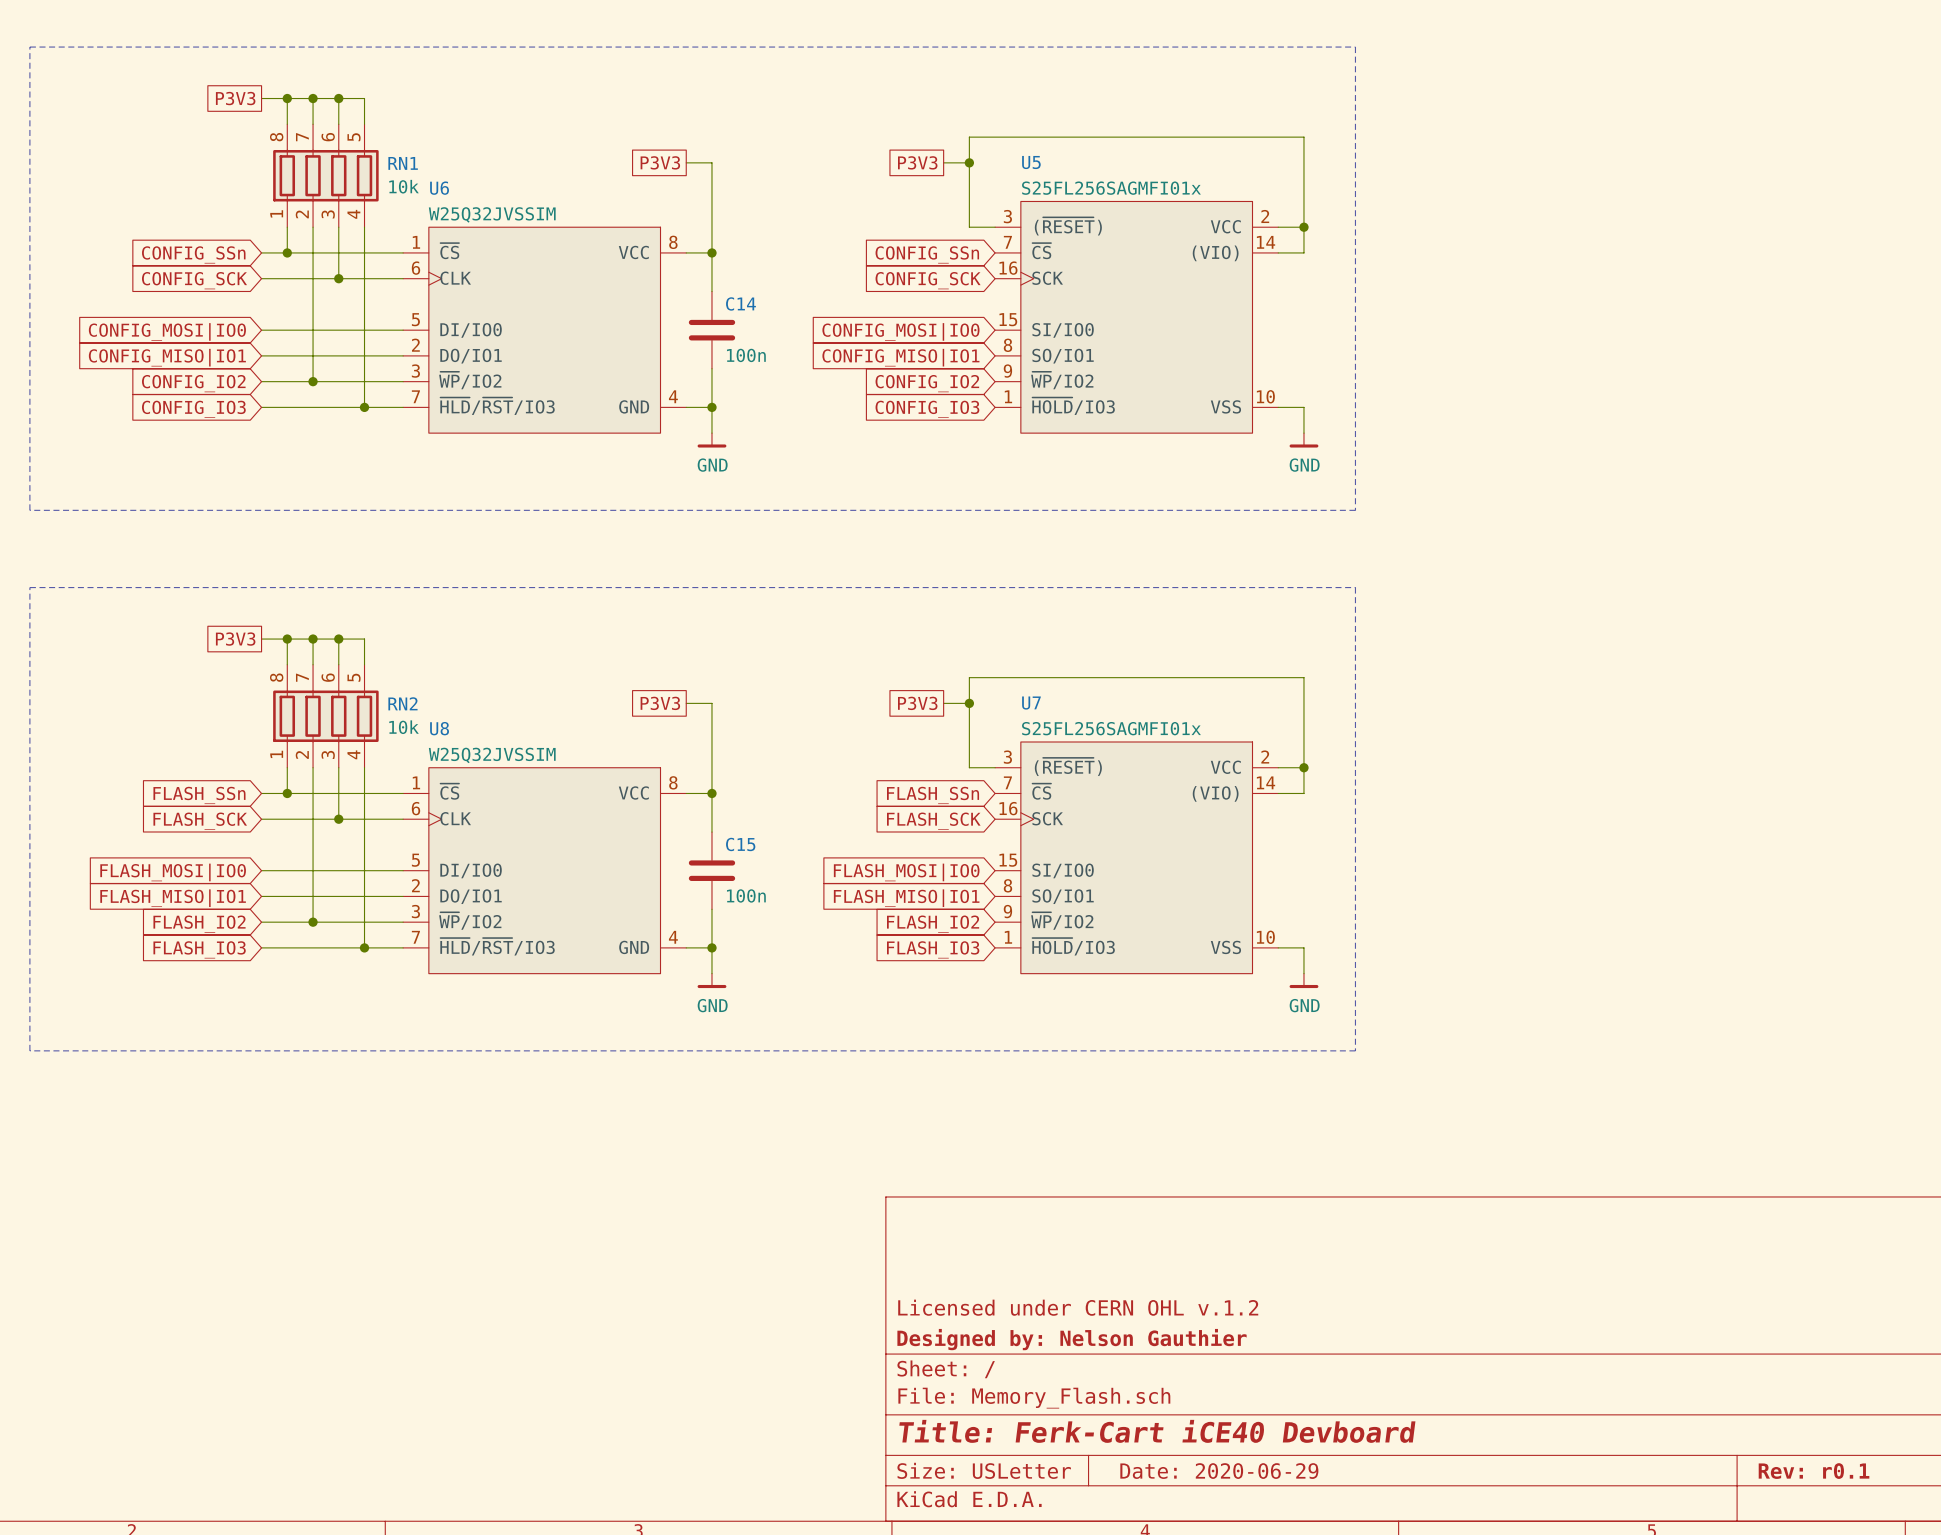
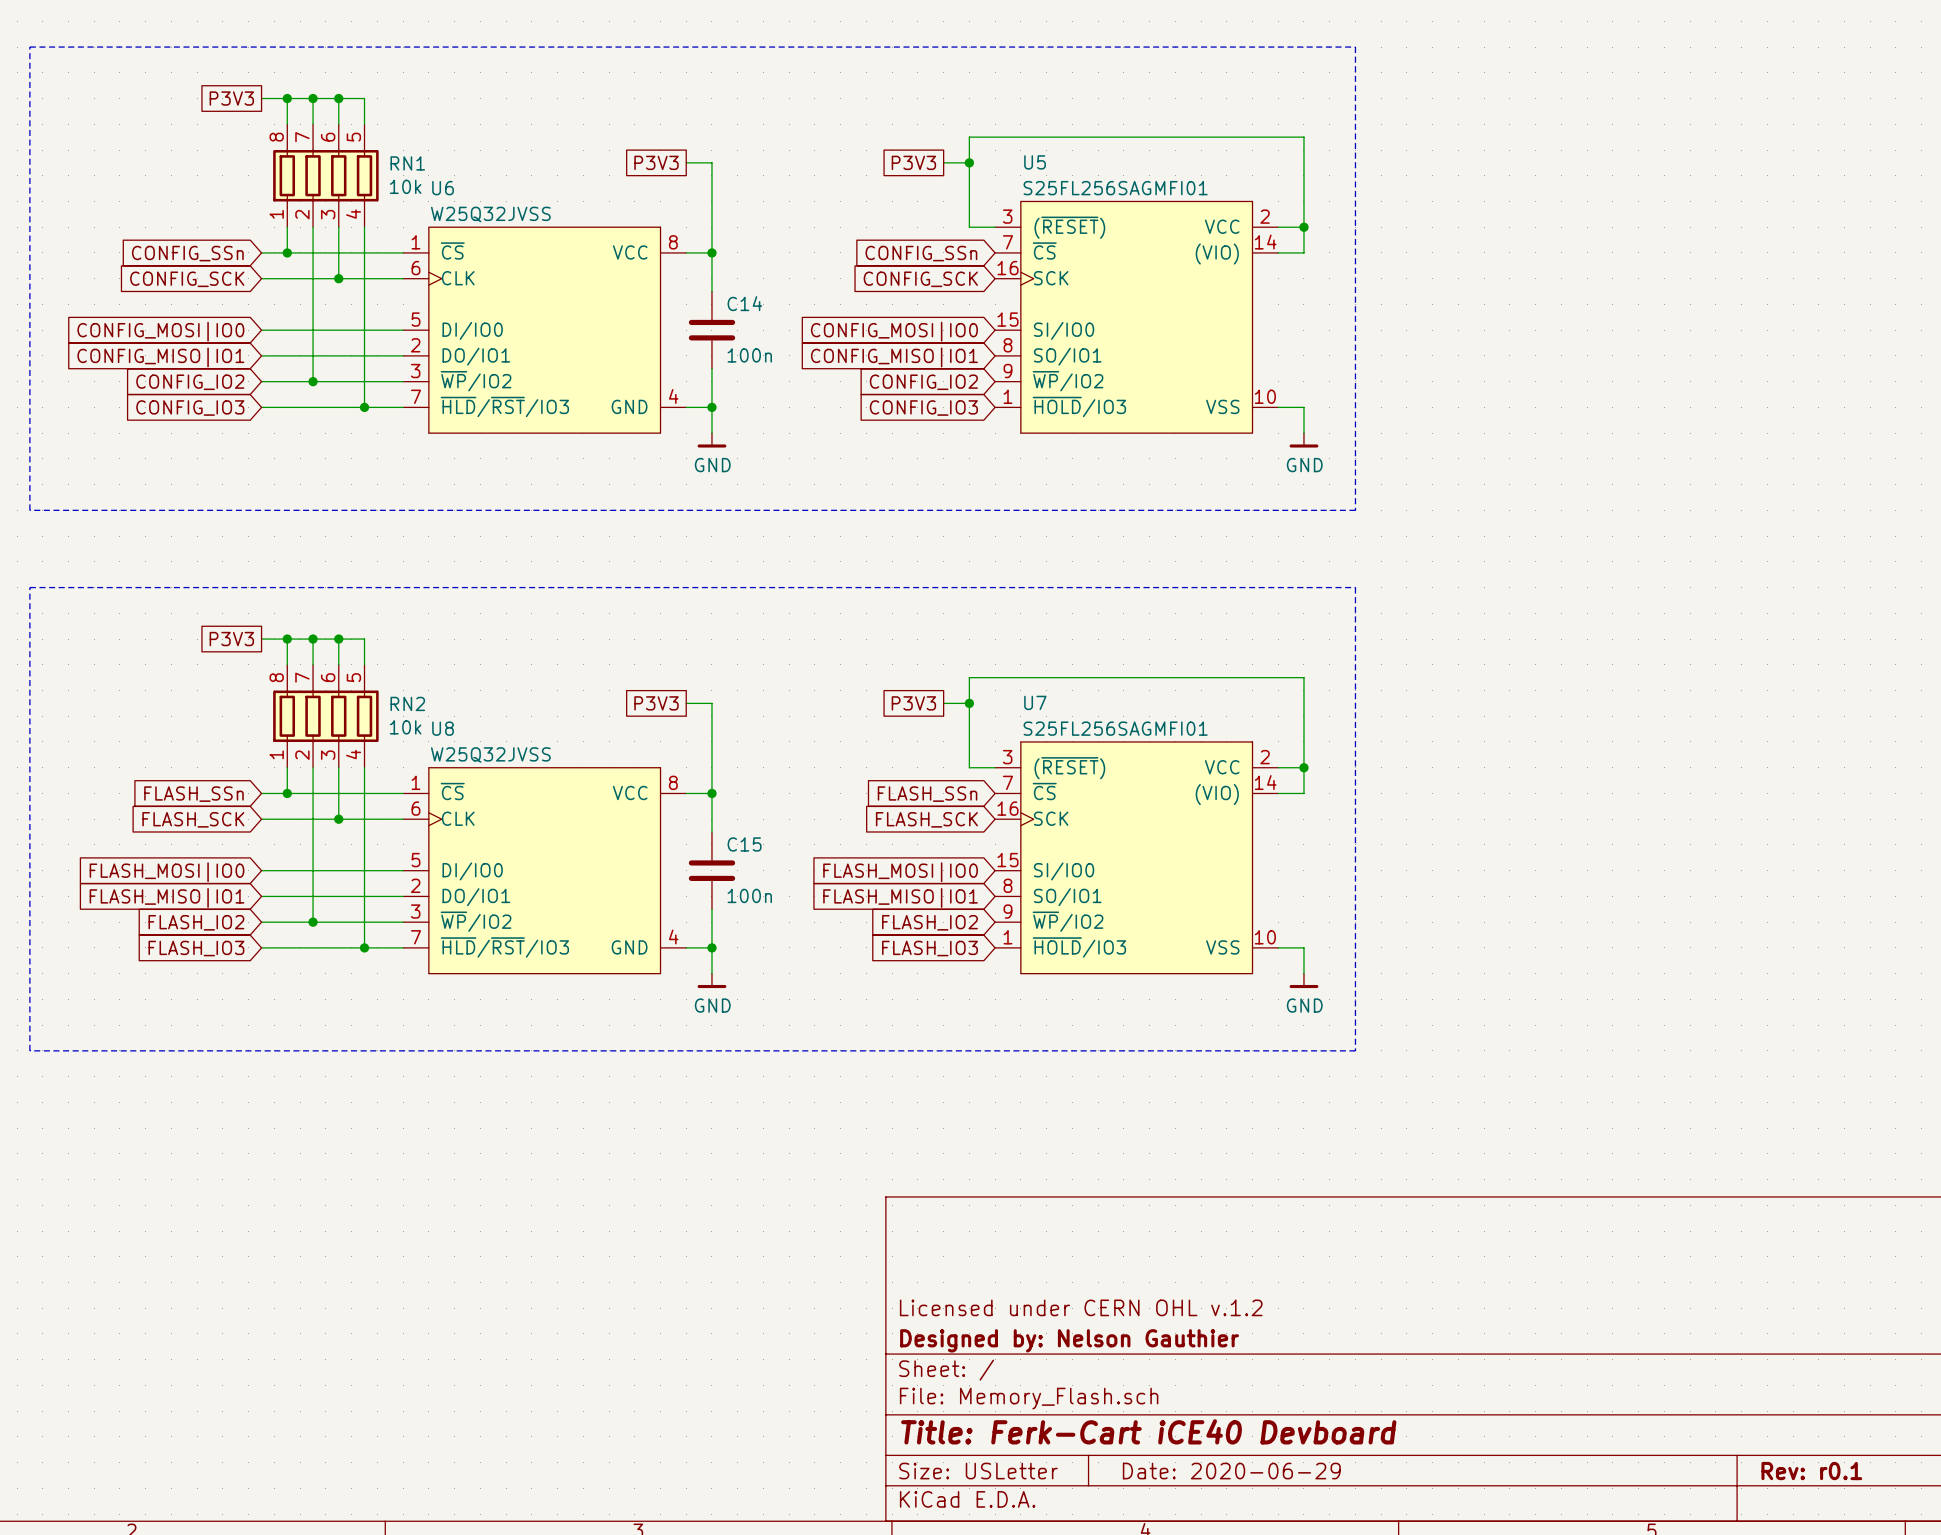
U5 value: S25FL256SAGMFI01x (1111, 188) -> S25FL256SAGMFI01 (1115, 188)
U6 value: W25Q32JVSSIM (492, 214) -> W25Q32JVSS (490, 214)
U7 value: S25FL256SAGMFI01x (1111, 728) -> S25FL256SAGMFI01 (1115, 728)
U8 value: W25Q32JVSSIM (492, 755) -> W25Q32JVSS (490, 755)

